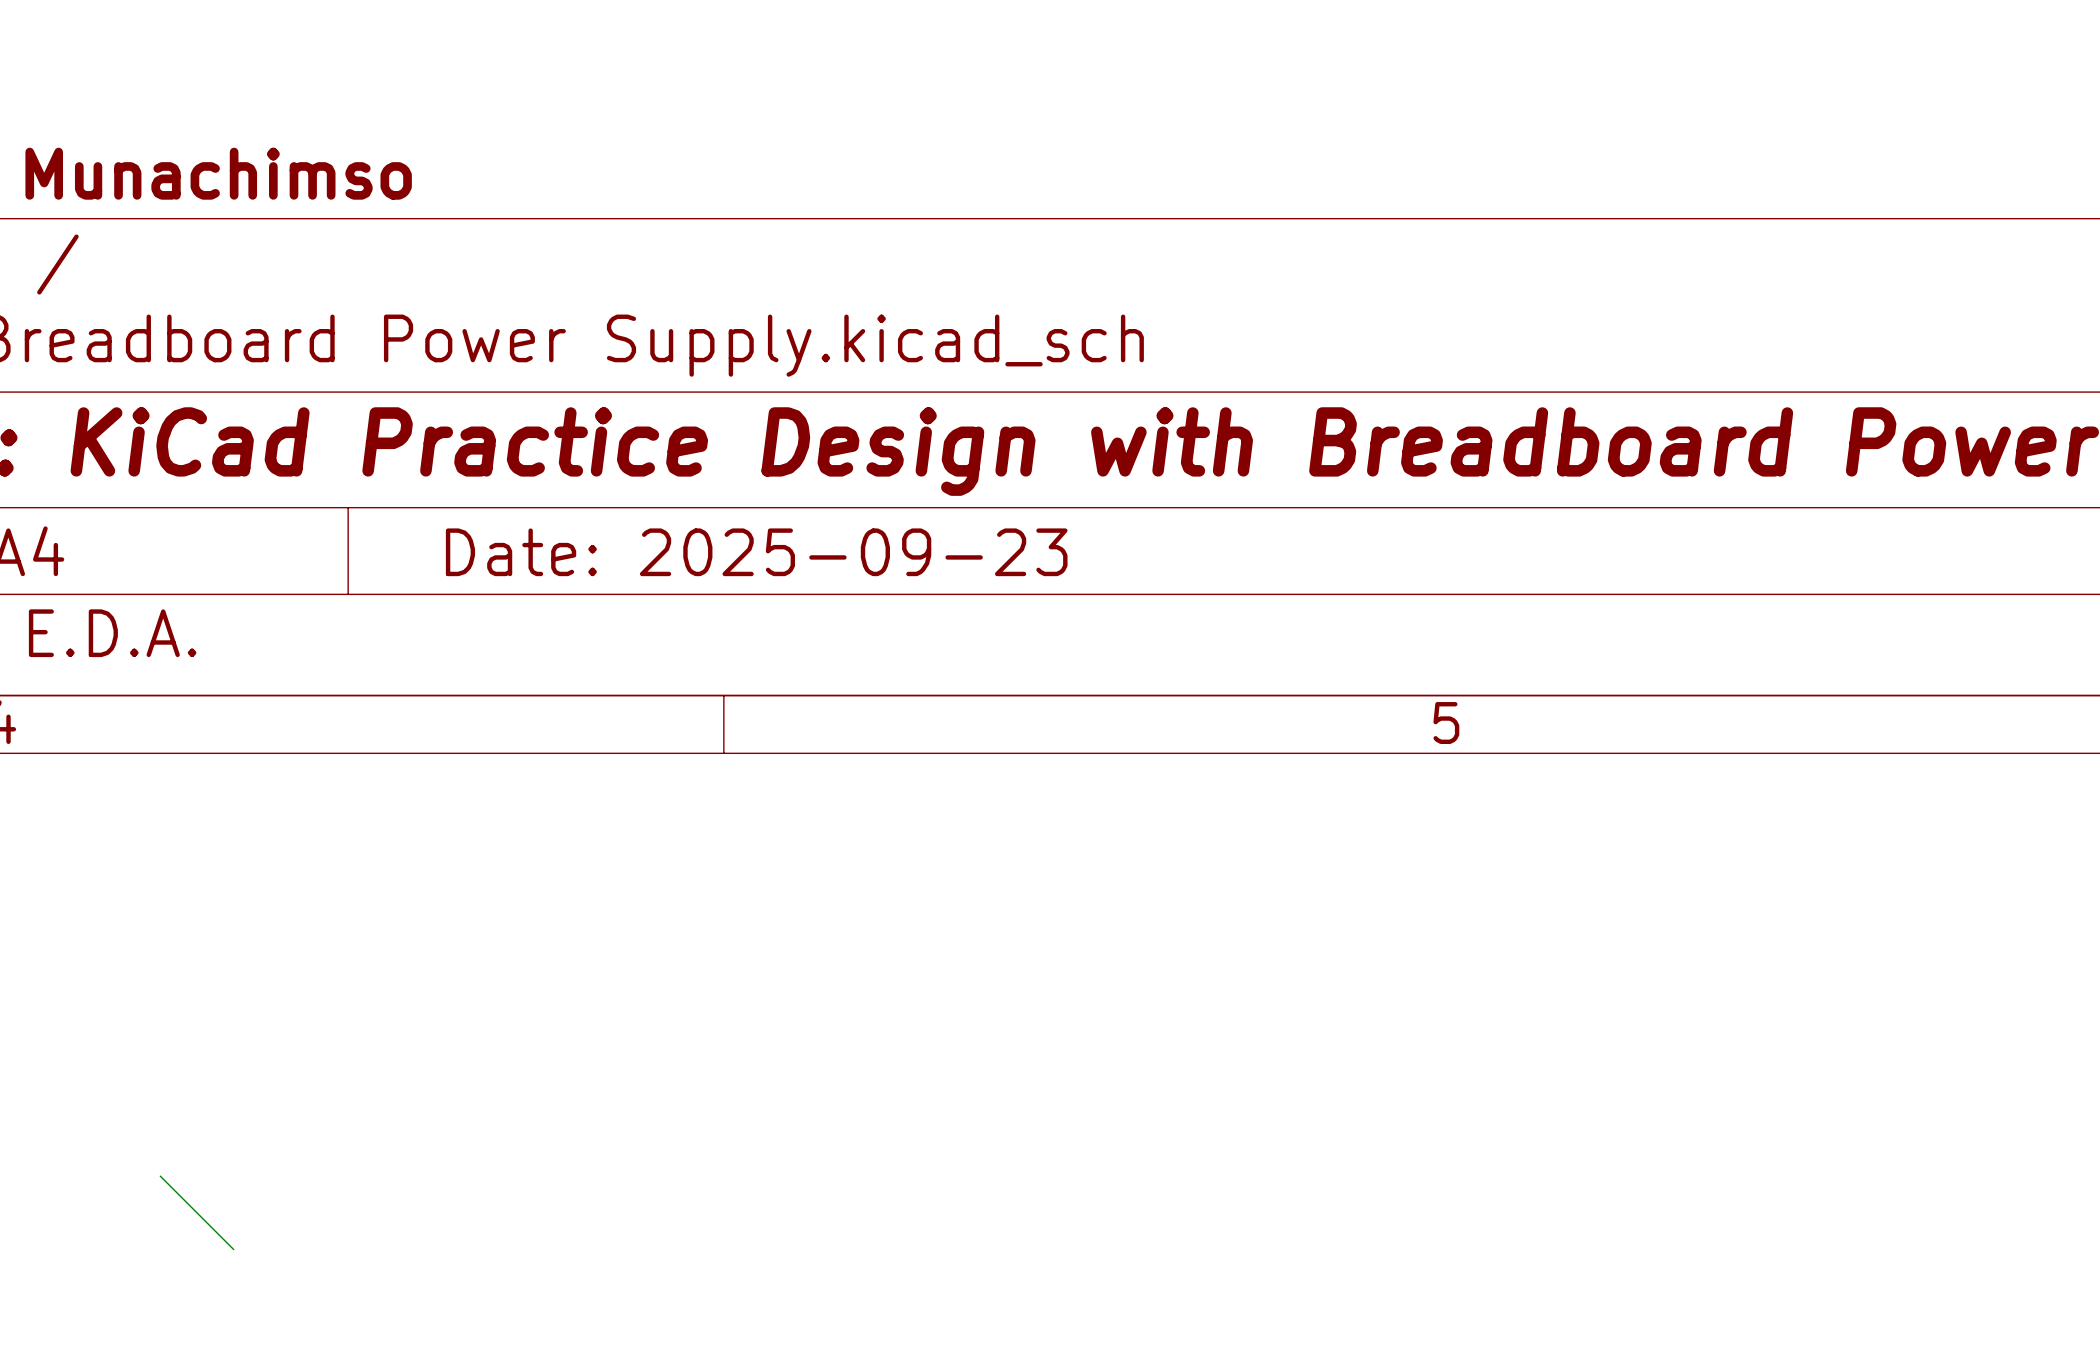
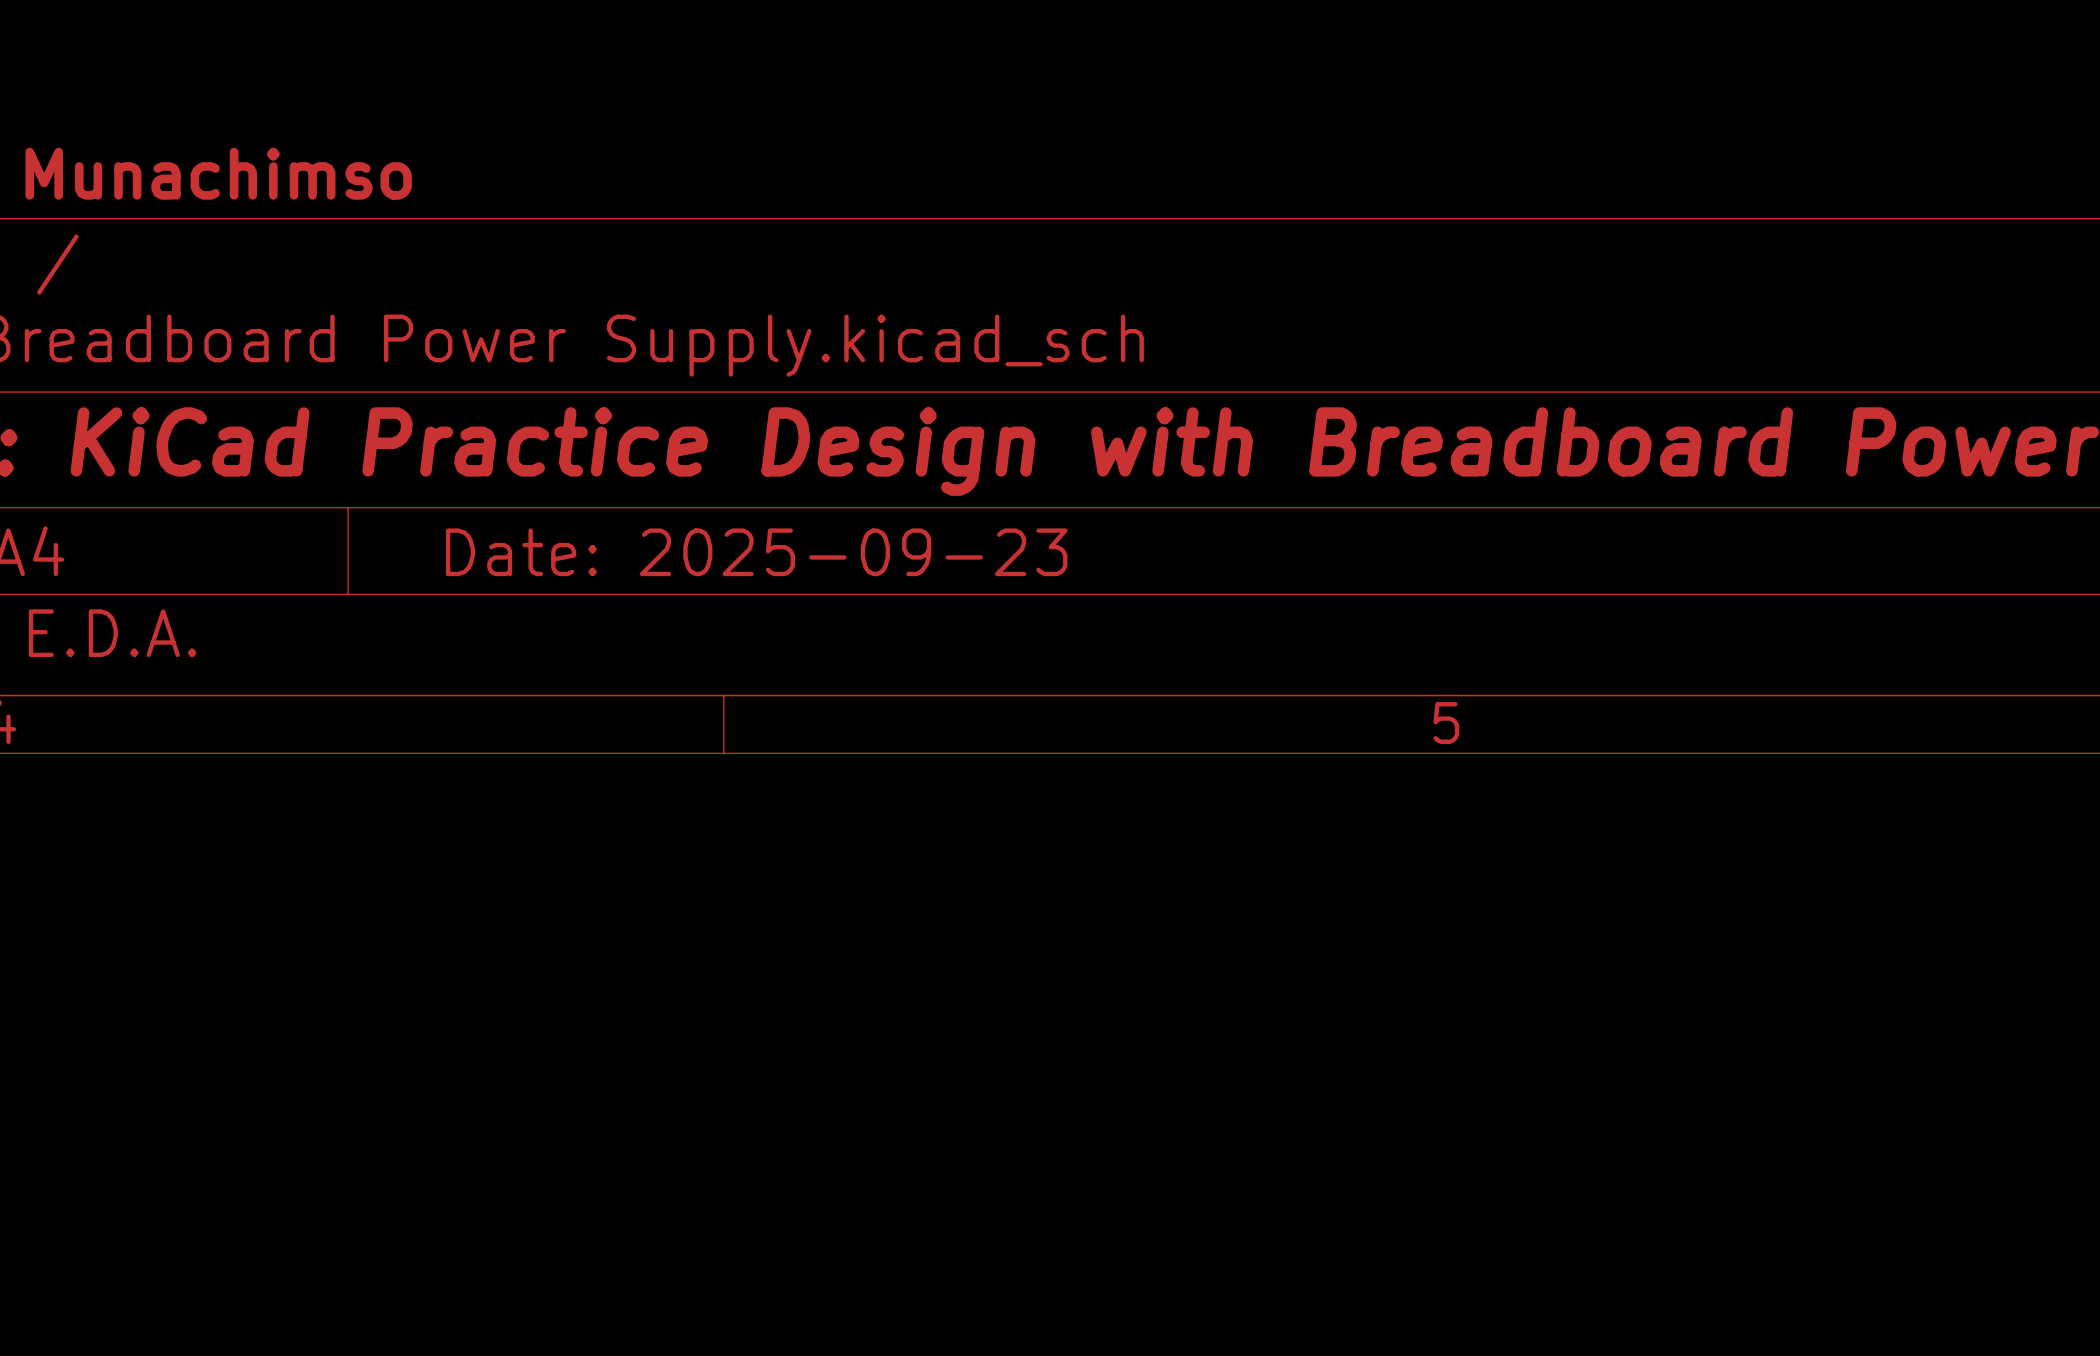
wire: (160, 1176) (233, 1249) -> none

